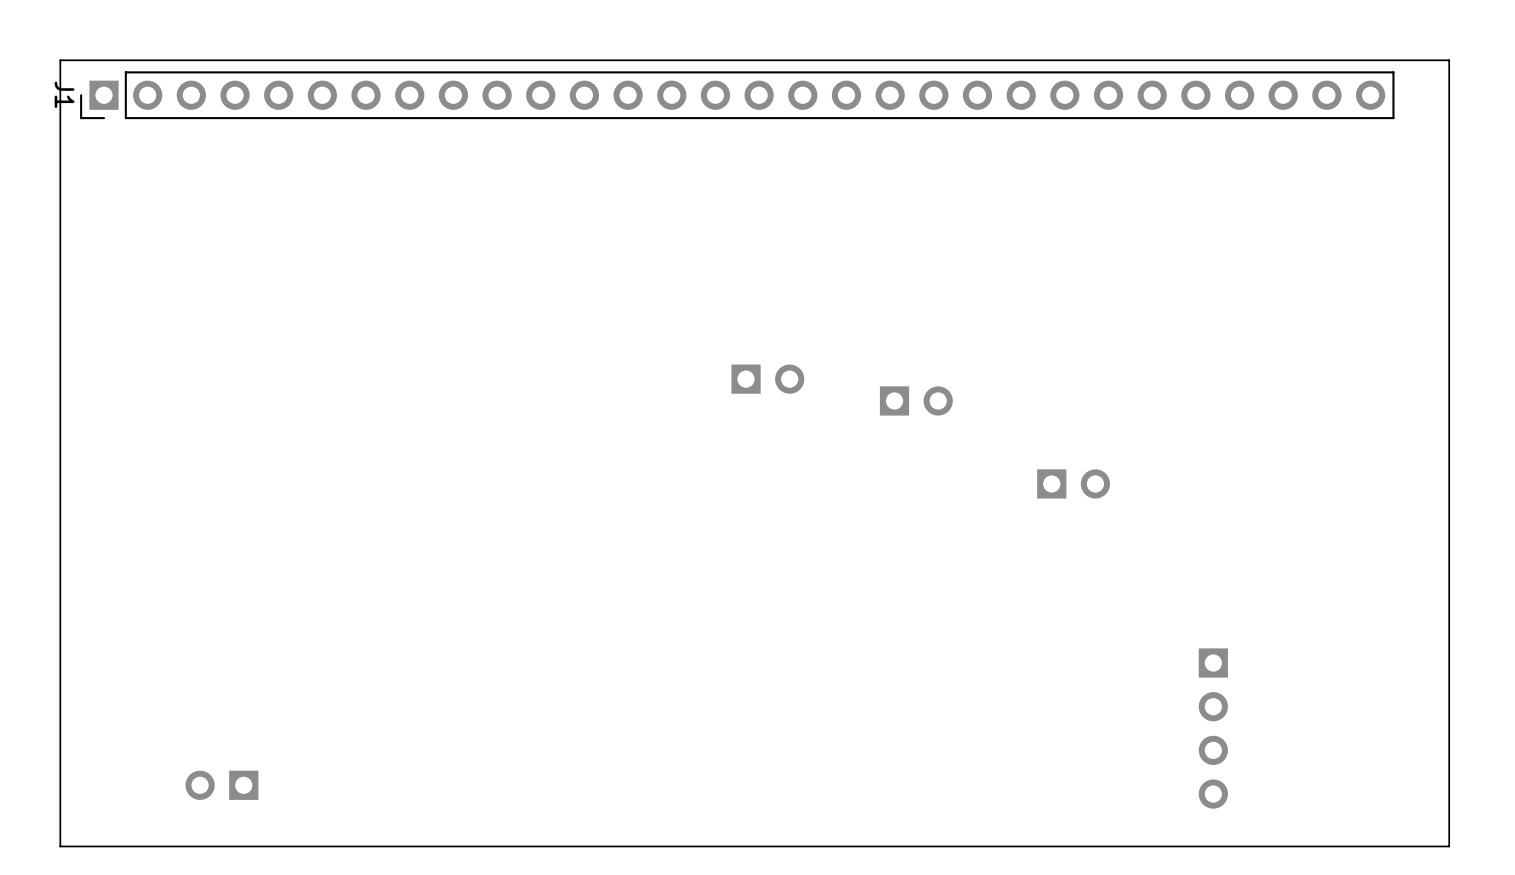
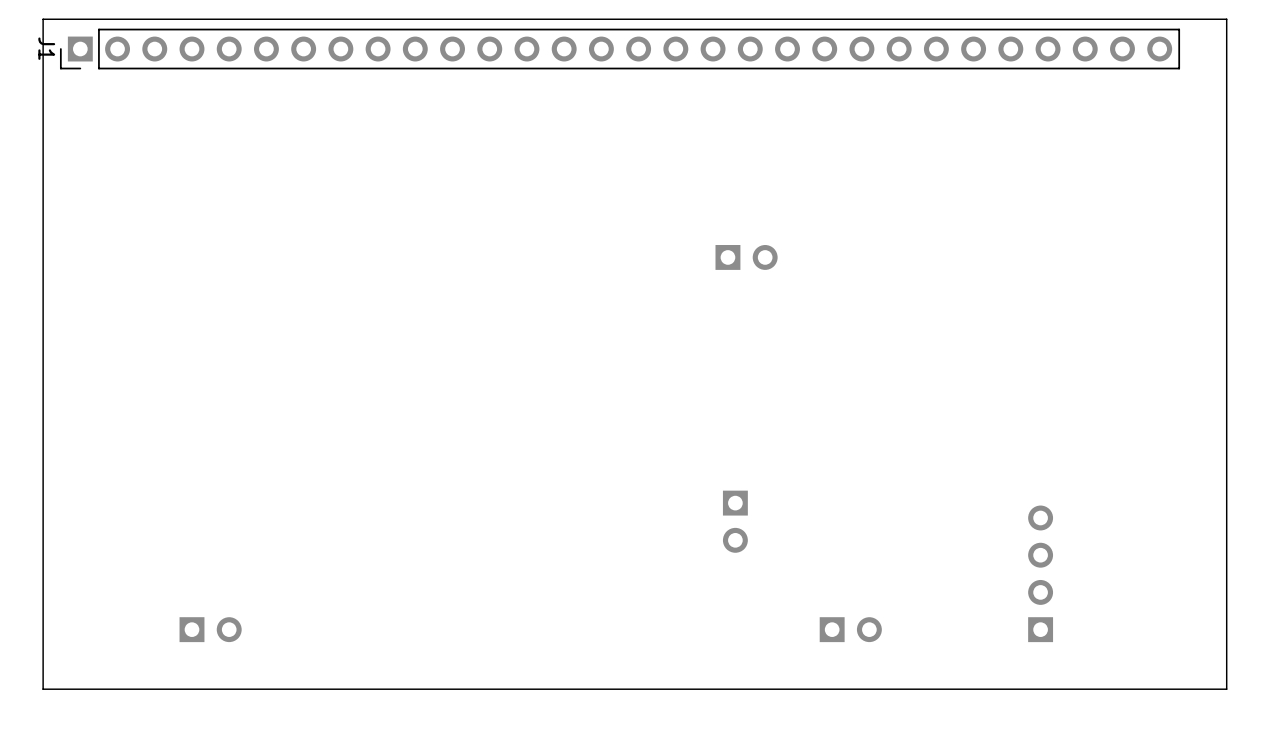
part: none -> (746, 257)
part: (767, 379) -> none
part: (916, 400) -> none
part: (1073, 483) -> none
part: none -> (735, 521)
part rotation: 0° (1213, 728) -> 180° (1040, 573)
part: none -> (850, 629)
part rotation: 0° (221, 785) -> 180° (210, 629)

